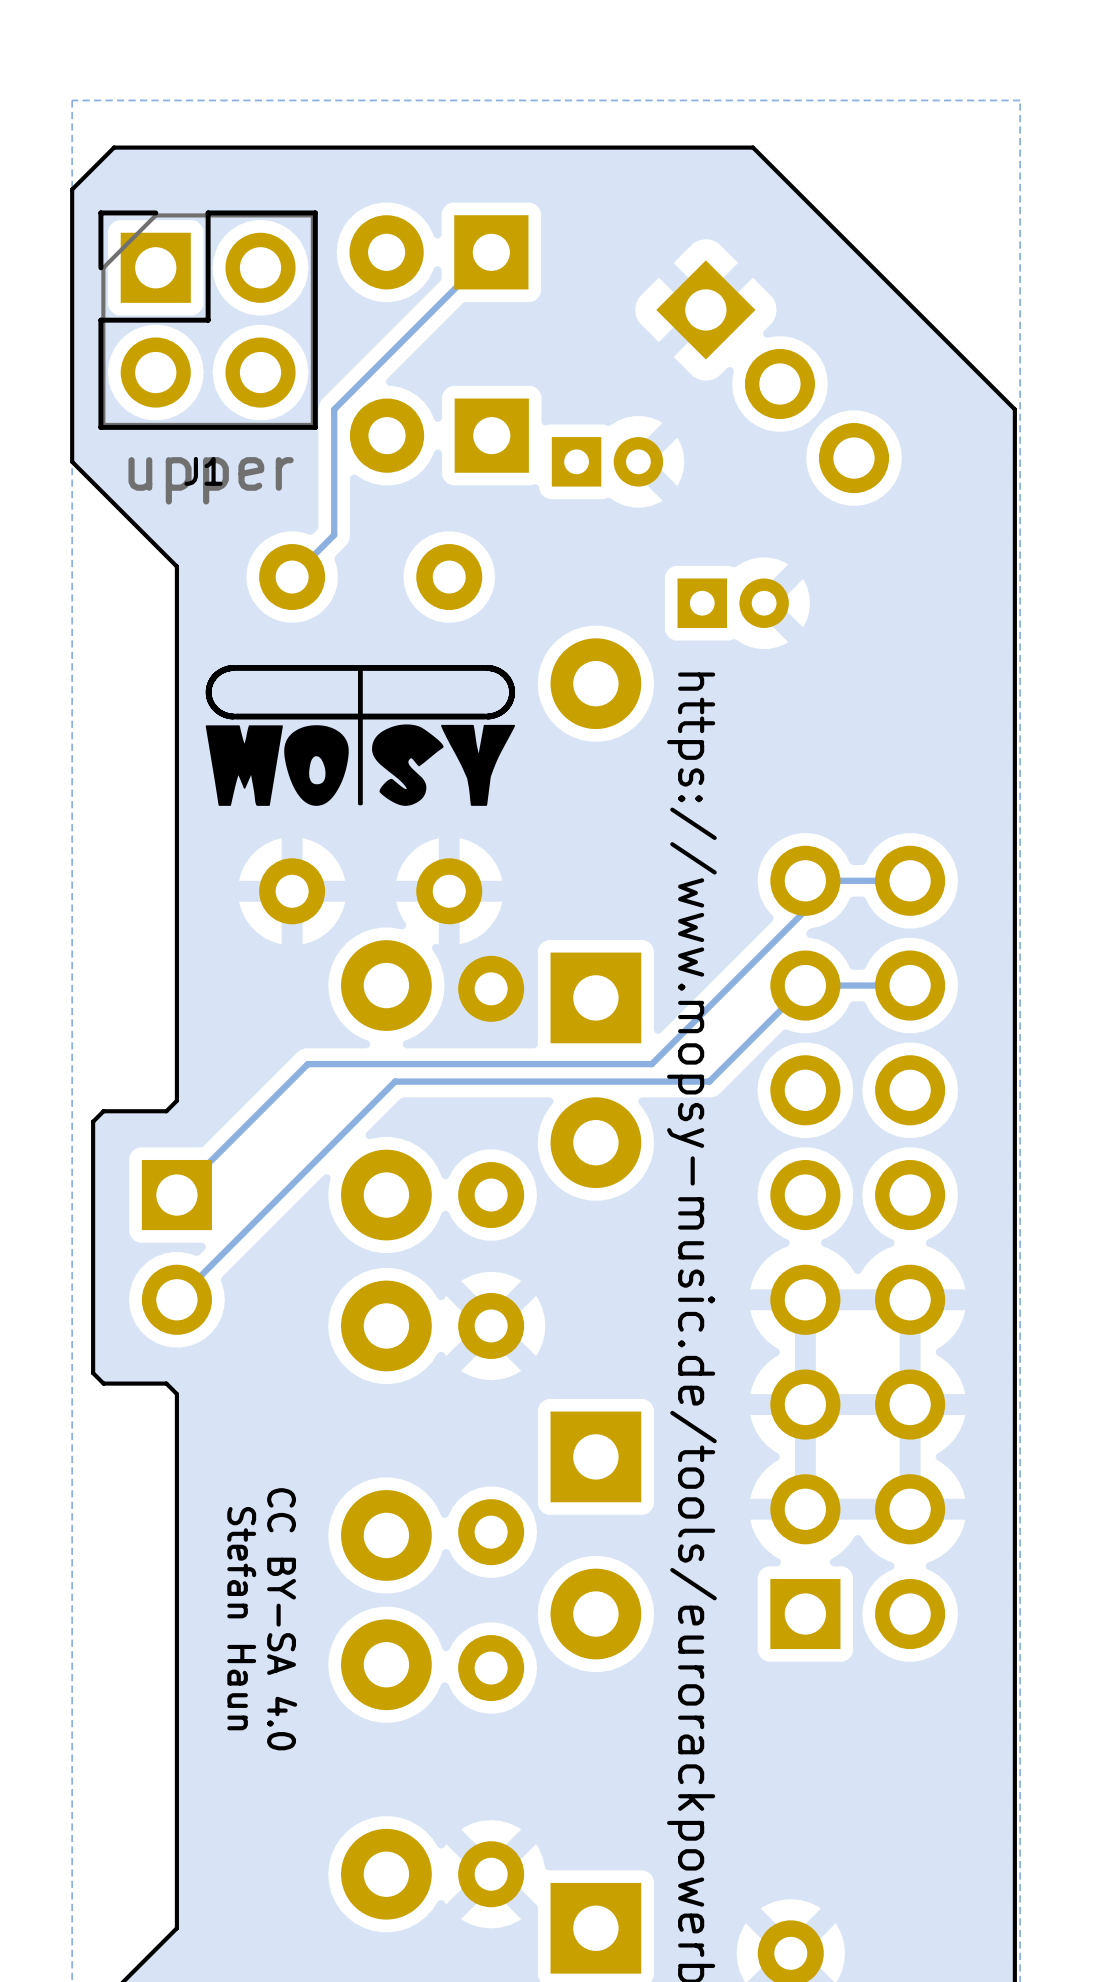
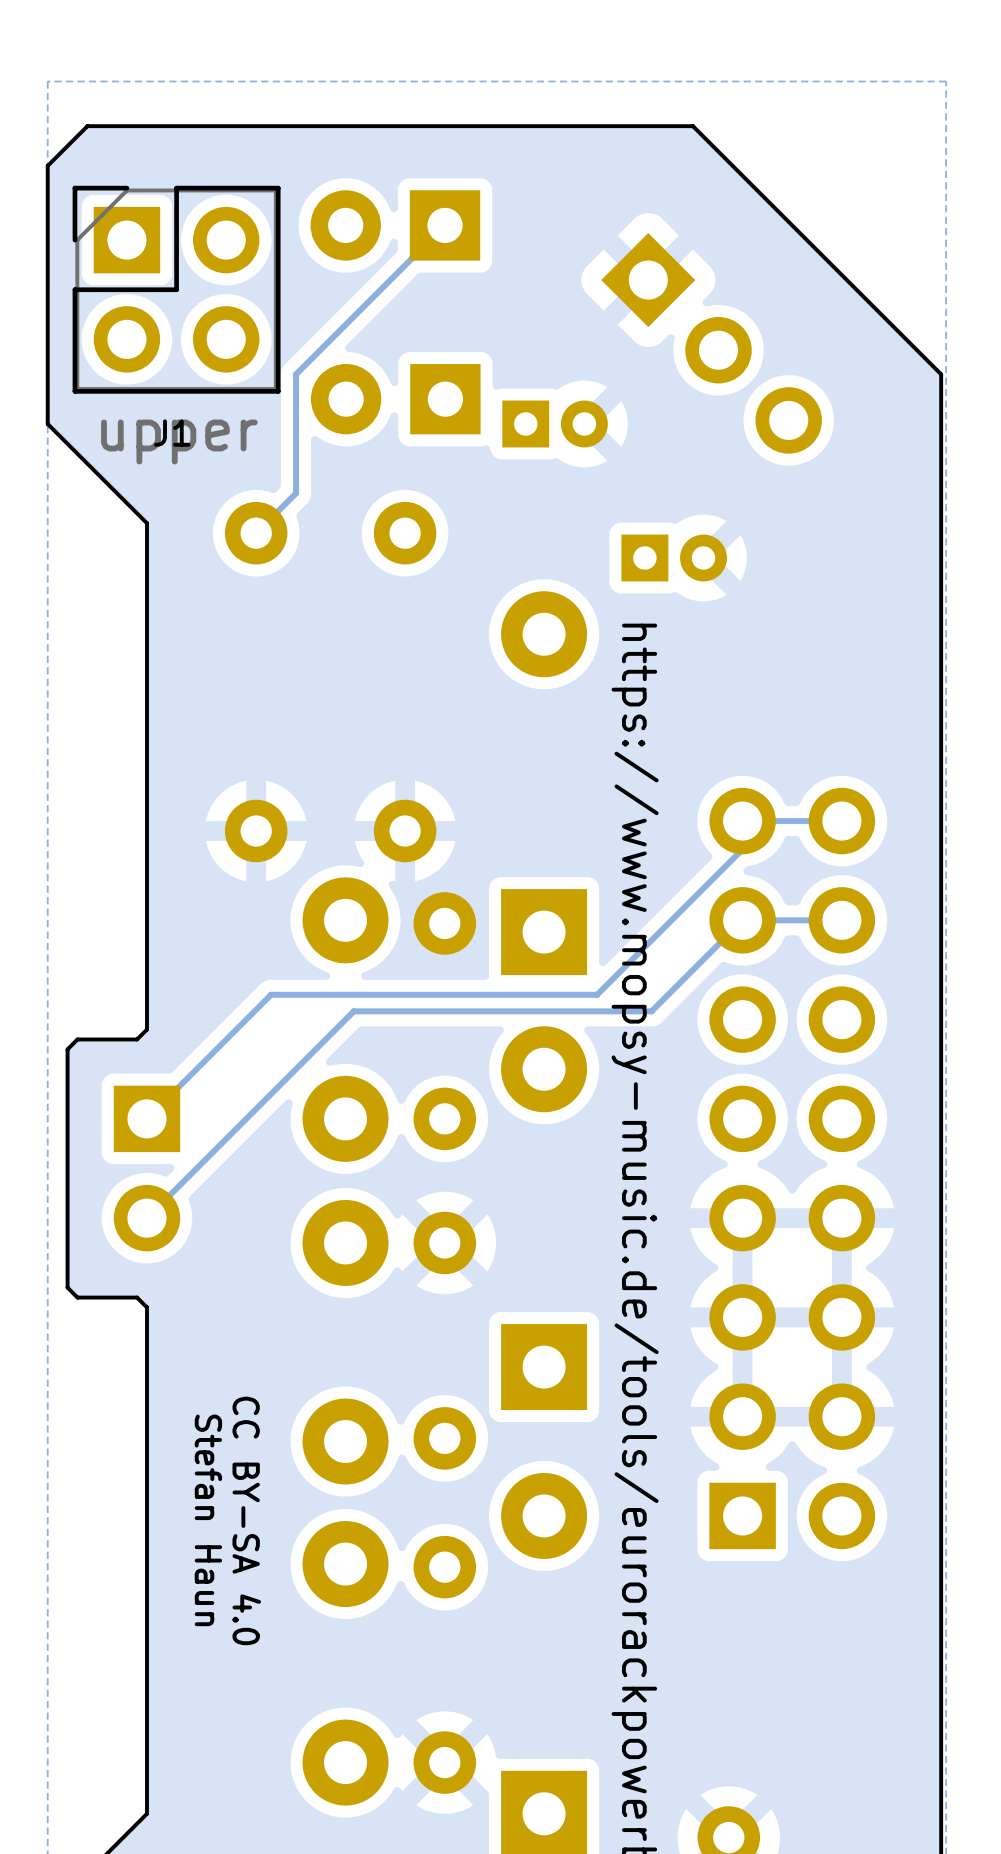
drawing: [205, 665, 516, 806] -> none
line: (234, 667) (218, 672) -> none
line: (486, 667) (502, 672) -> none
line: (212, 680) (208, 692) (212, 704) (221, 713) (234, 716) -> none
line: (508, 680) (512, 692) (508, 704) (499, 713) (486, 716) -> none

